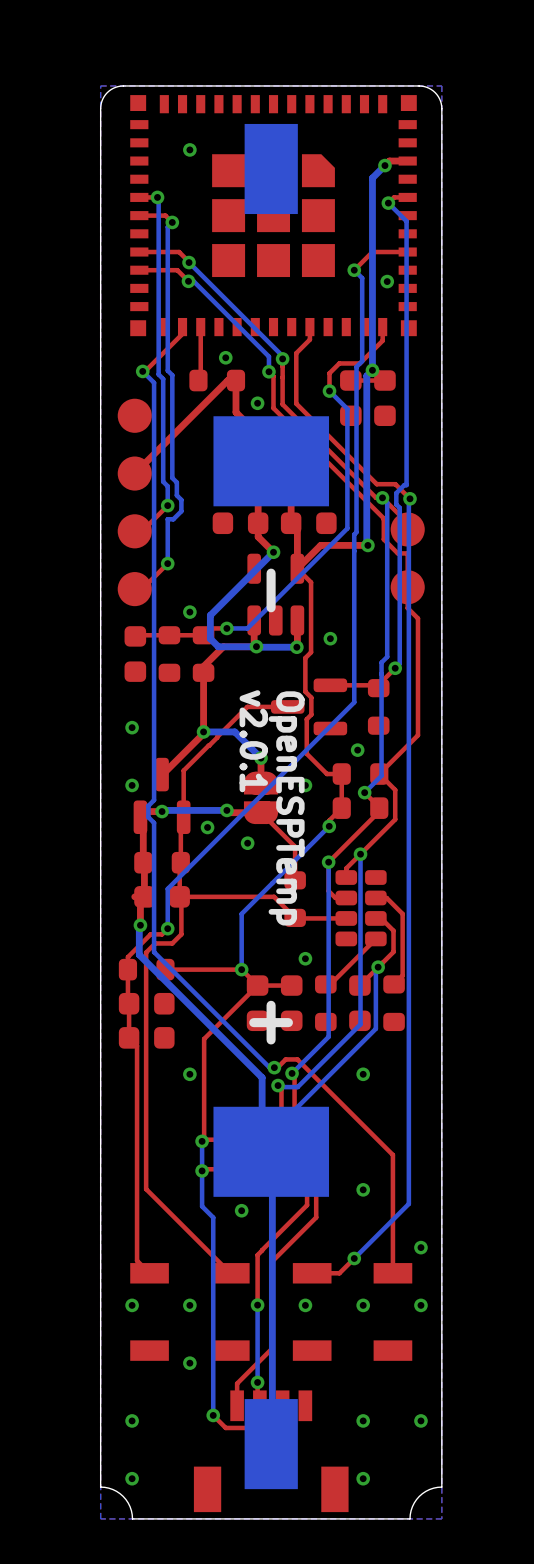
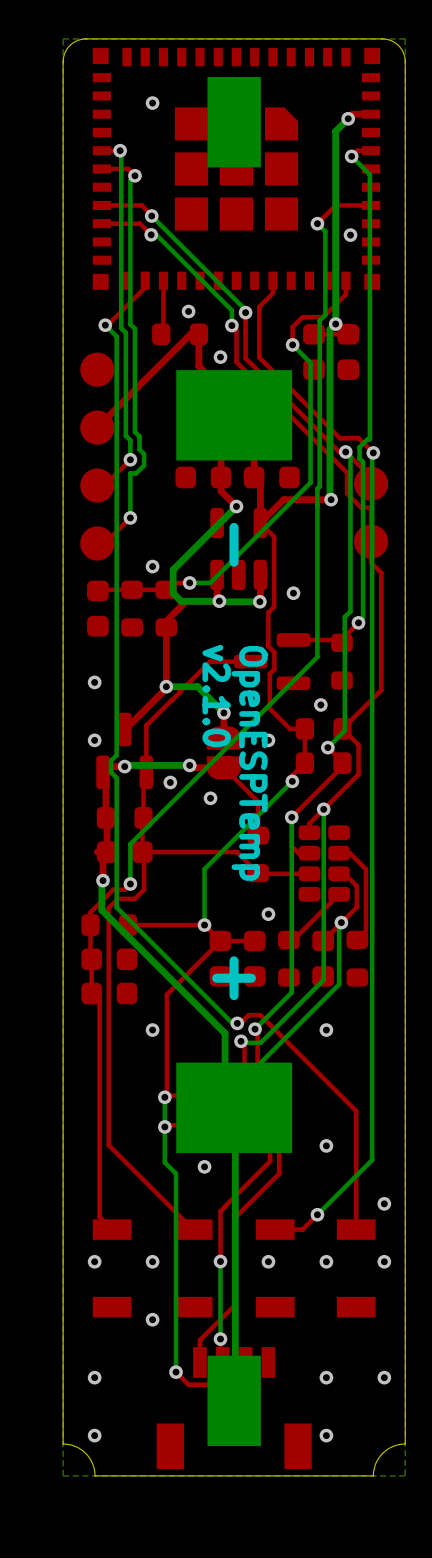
text: v2.0.1 (253, 741) -> v2.1.0 (216, 696)

